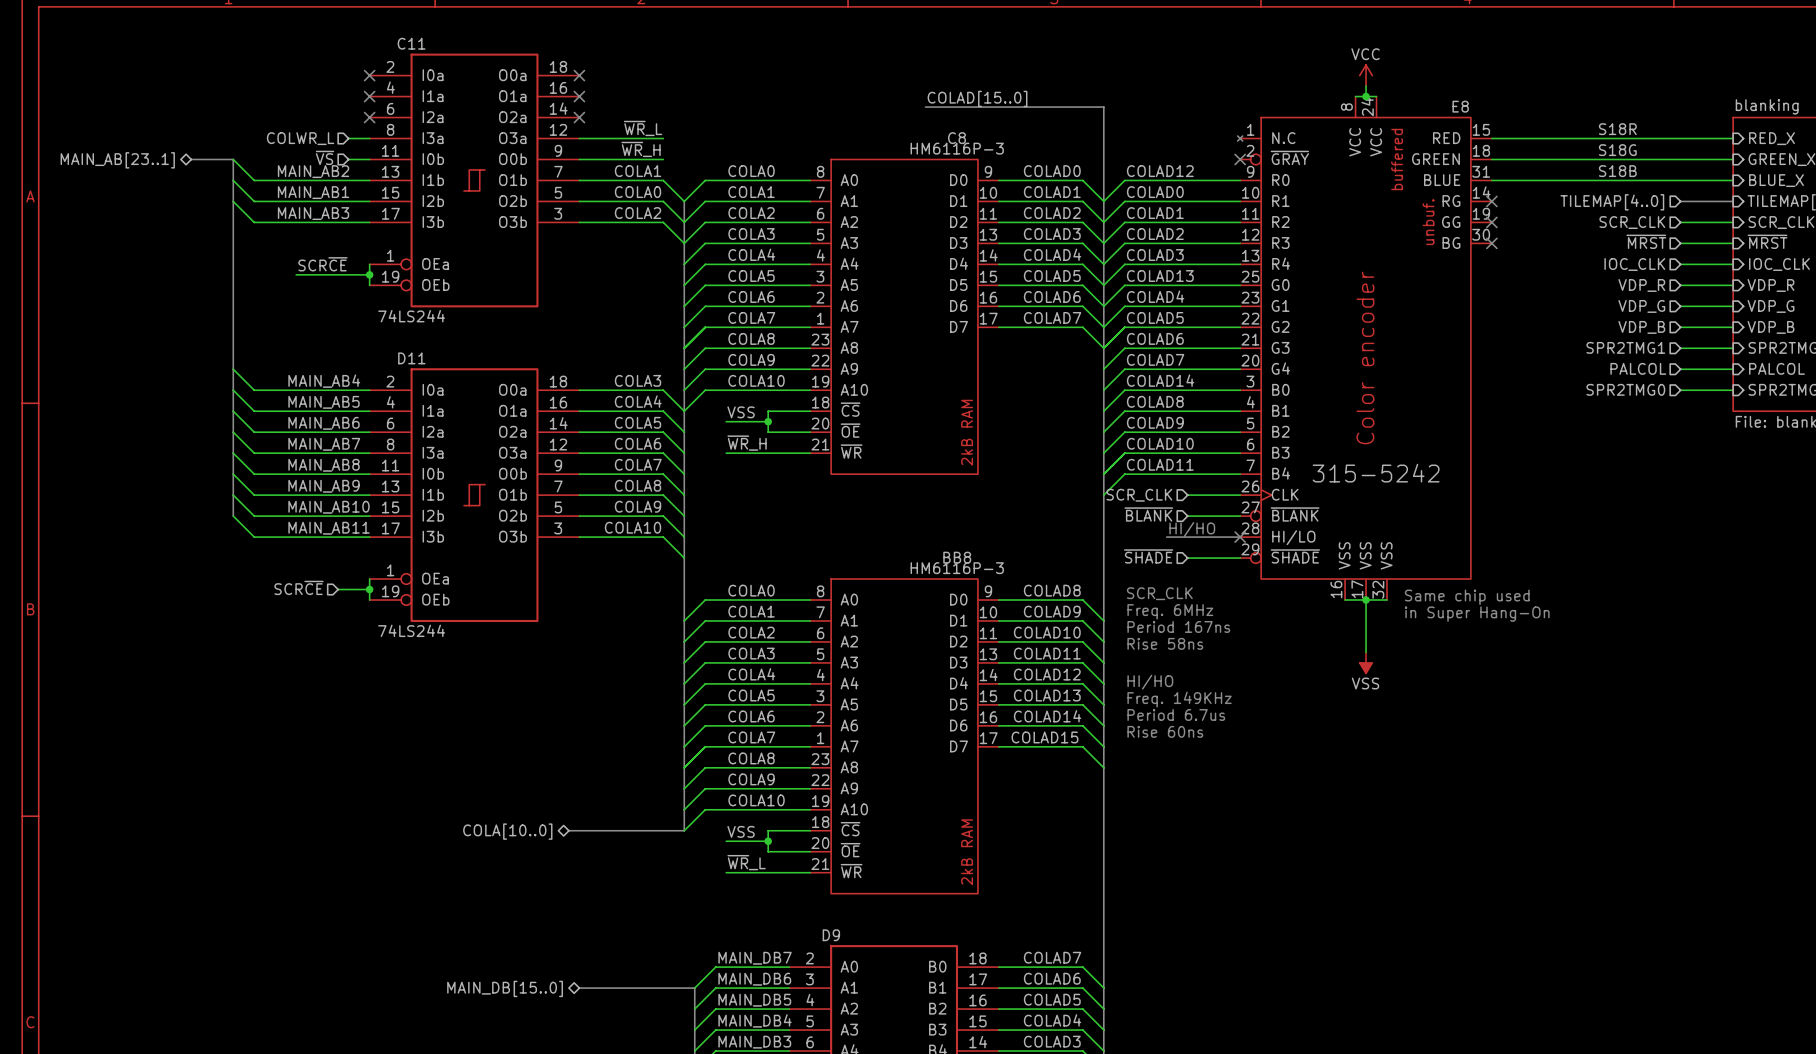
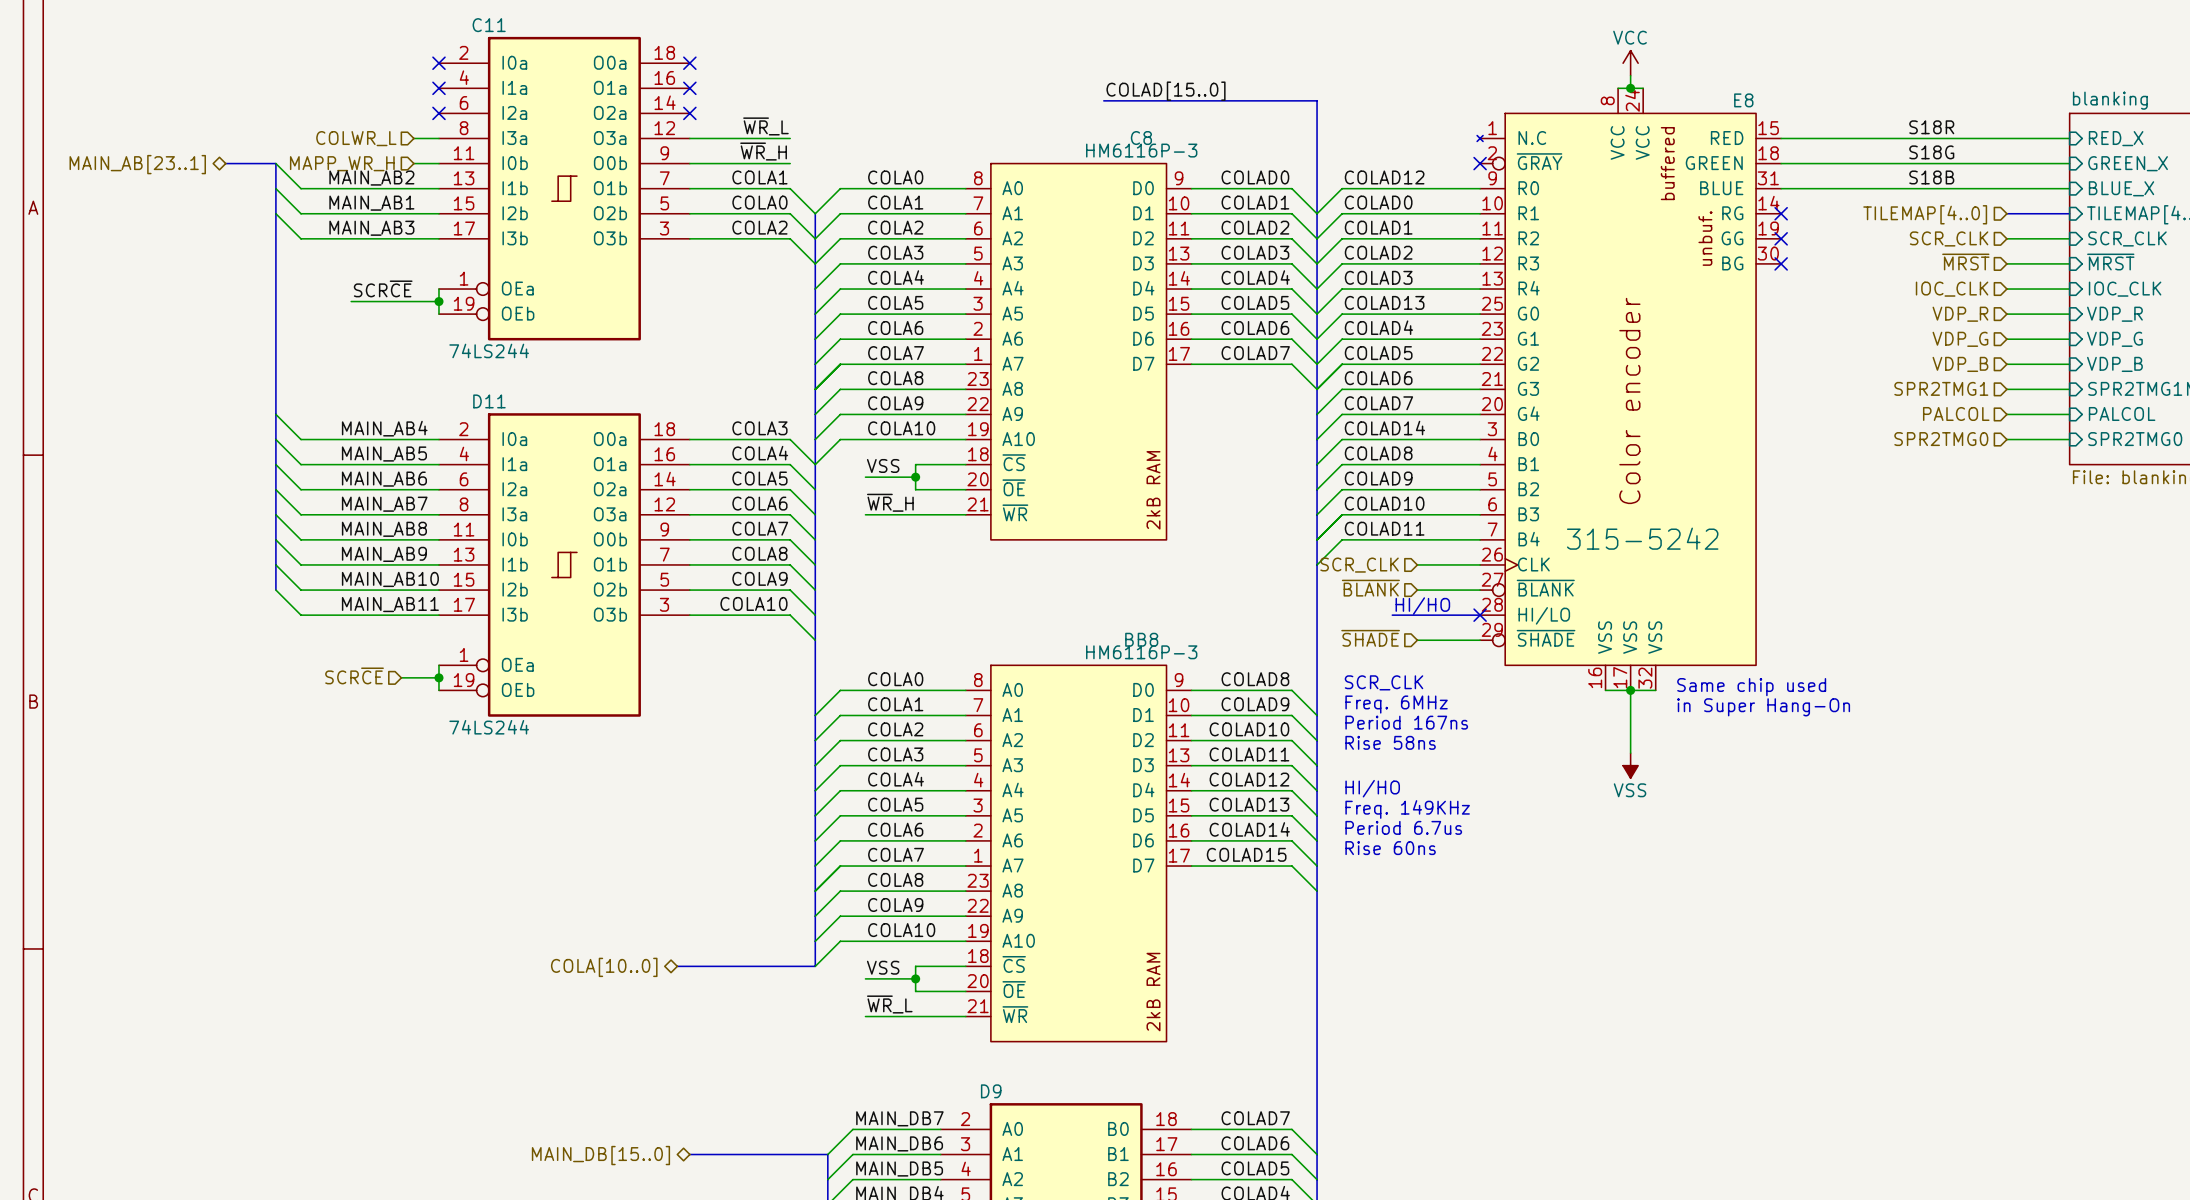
hierarchical label: ~{VS} (324, 157) -> MAPP_WR_H (342, 163)

